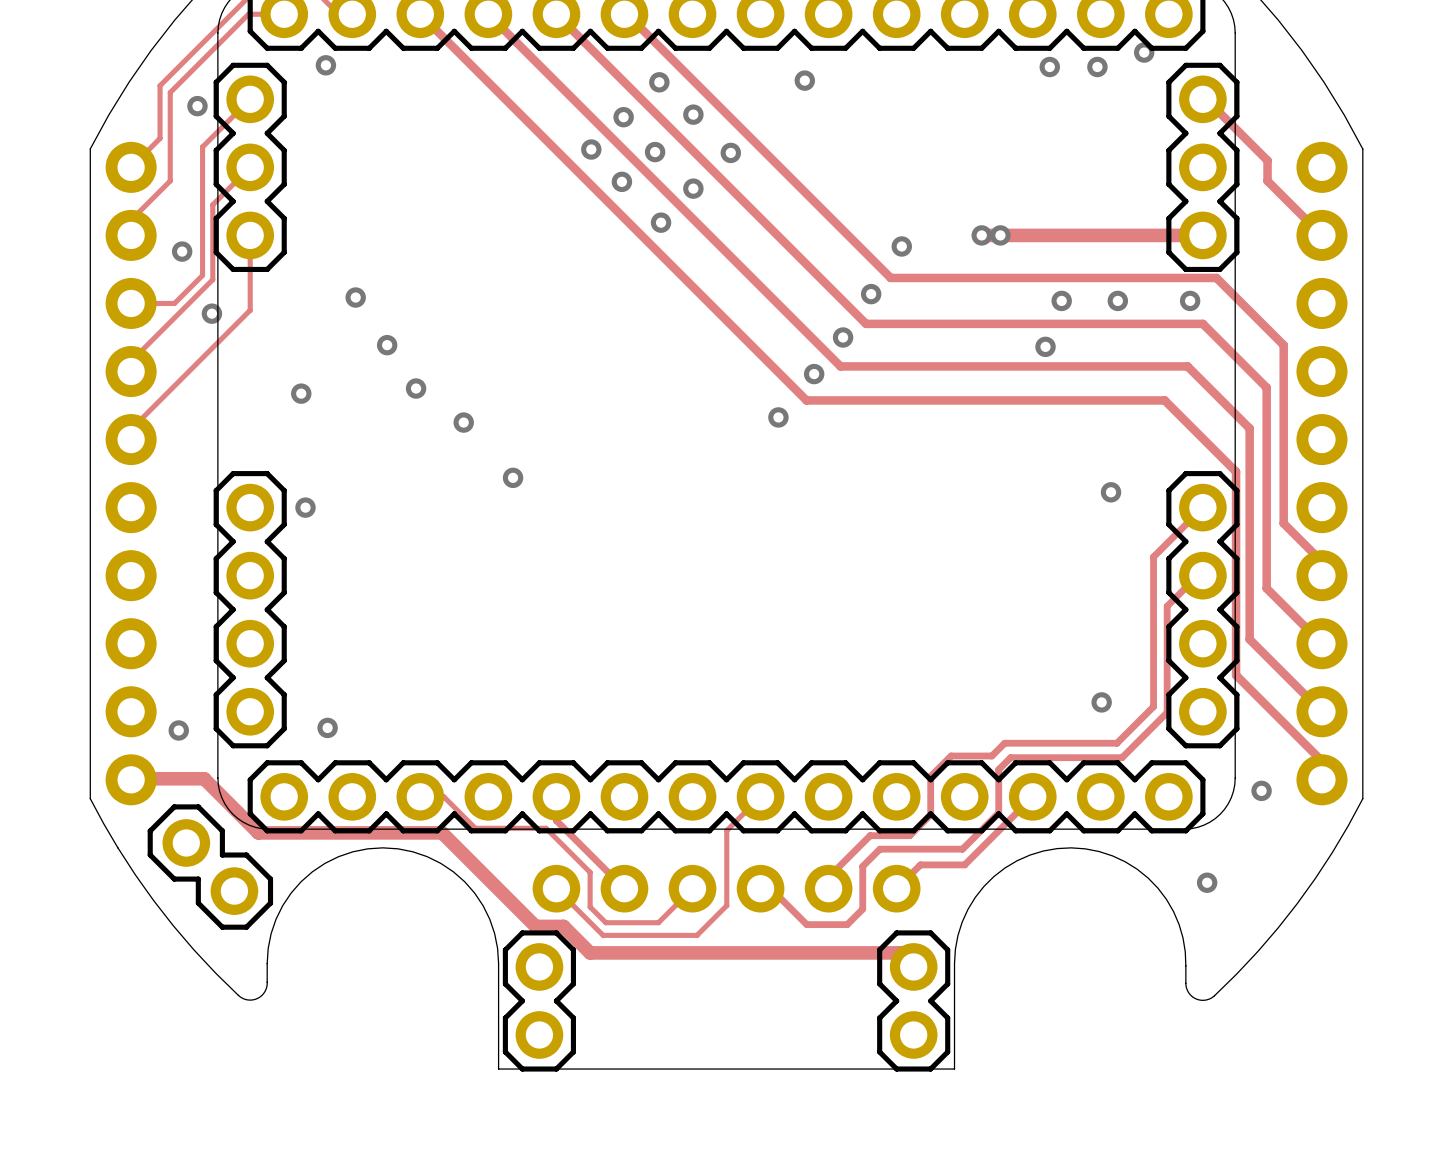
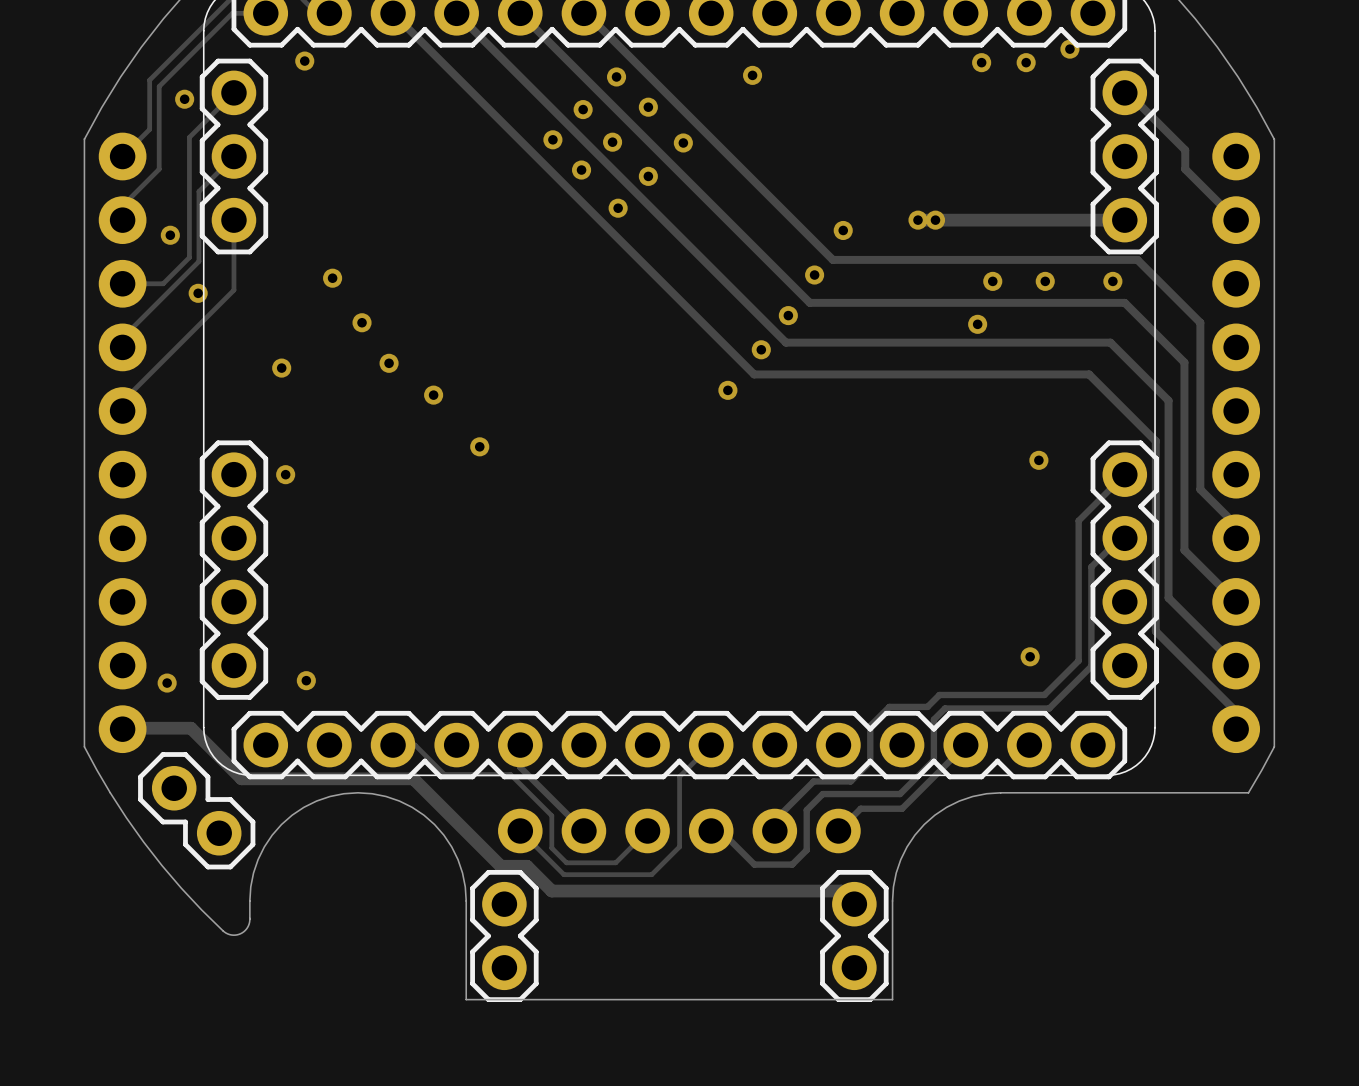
via: (1261, 790) -> none
board edge: (1362, 798) (1332, 852) (1297, 903) (1257, 951) (1208, 999) (1196, 998) (1187, 989) (1183, 937) (1173, 911) (1157, 888) (1148, 878) (1125, 861) (1112, 855) (1085, 848) (1057, 848) (1043, 850) (1017, 860) (993, 876) (975, 897) (962, 922) (957, 935) (954, 963) -> (1274, 746) (1248, 792) (1000, 792) (986, 793) (959, 801) (946, 807) (924, 824) (907, 846) (896, 872) (892, 900)
via: (1207, 882) -> none

